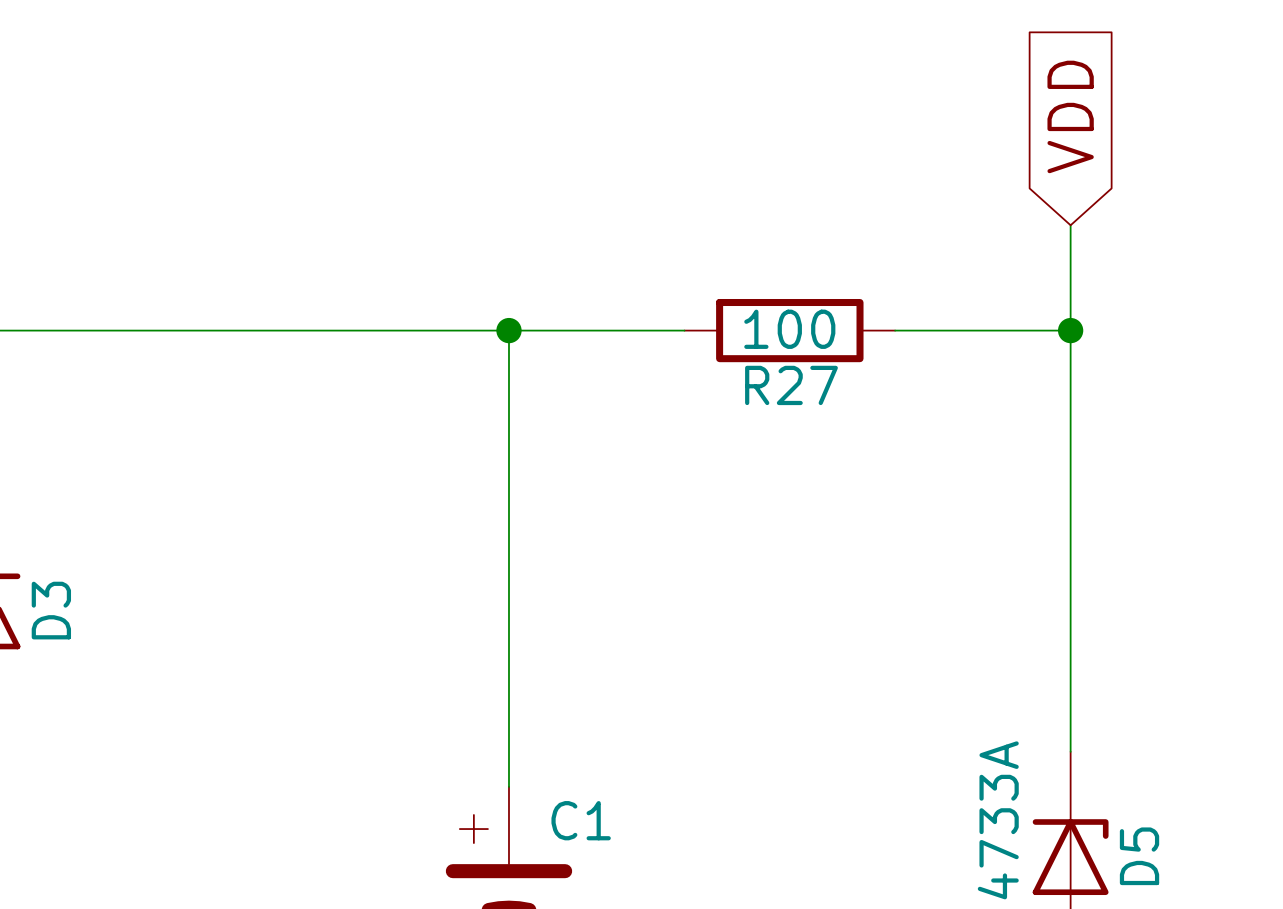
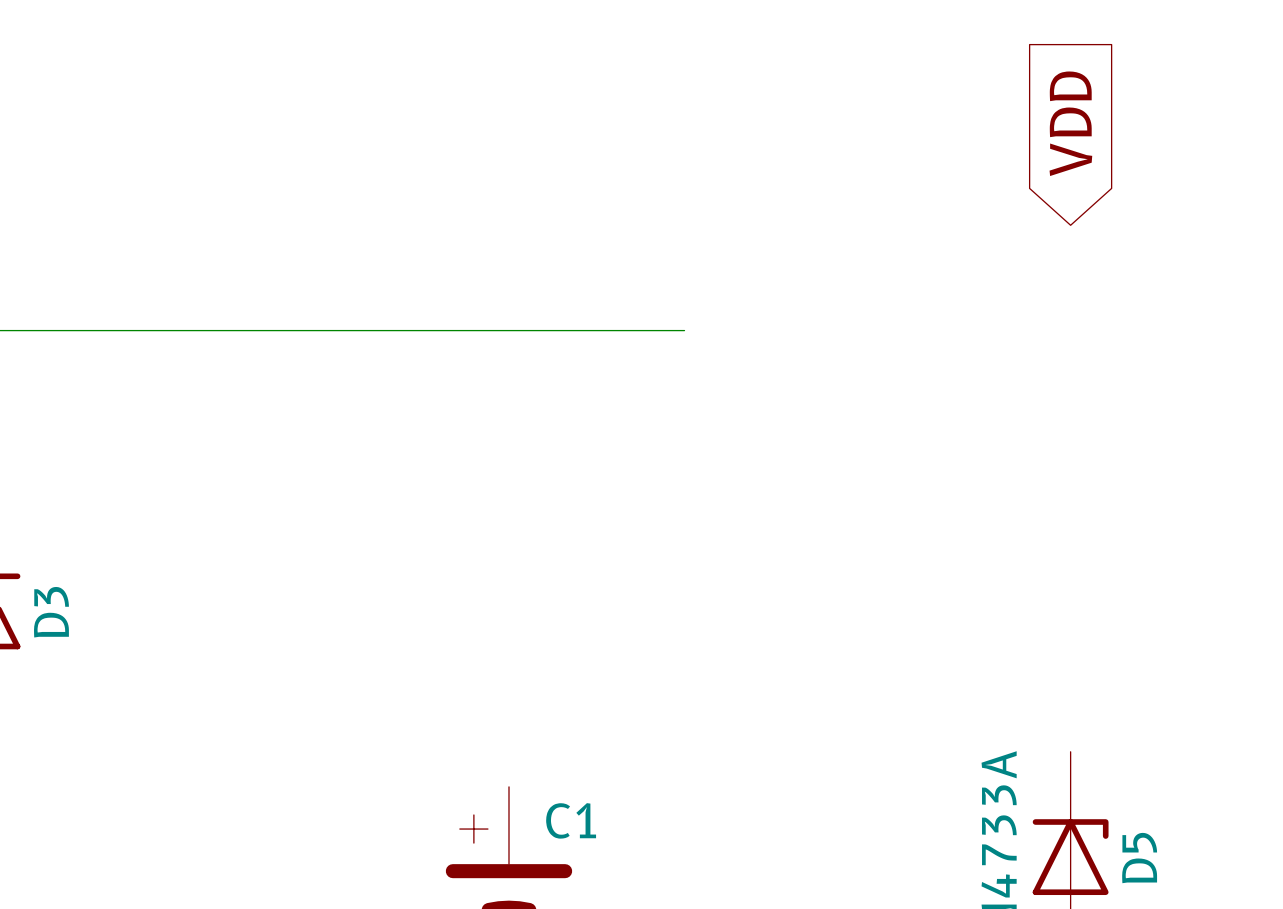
wire: (1070, 225) (1070, 751) -> none
wire: (508, 330) (508, 786) -> none
junction: (508, 330) -> none
R27: 100 (789, 330) -> none
wire: (895, 330) (1070, 330) -> none
junction: (1070, 330) -> none

